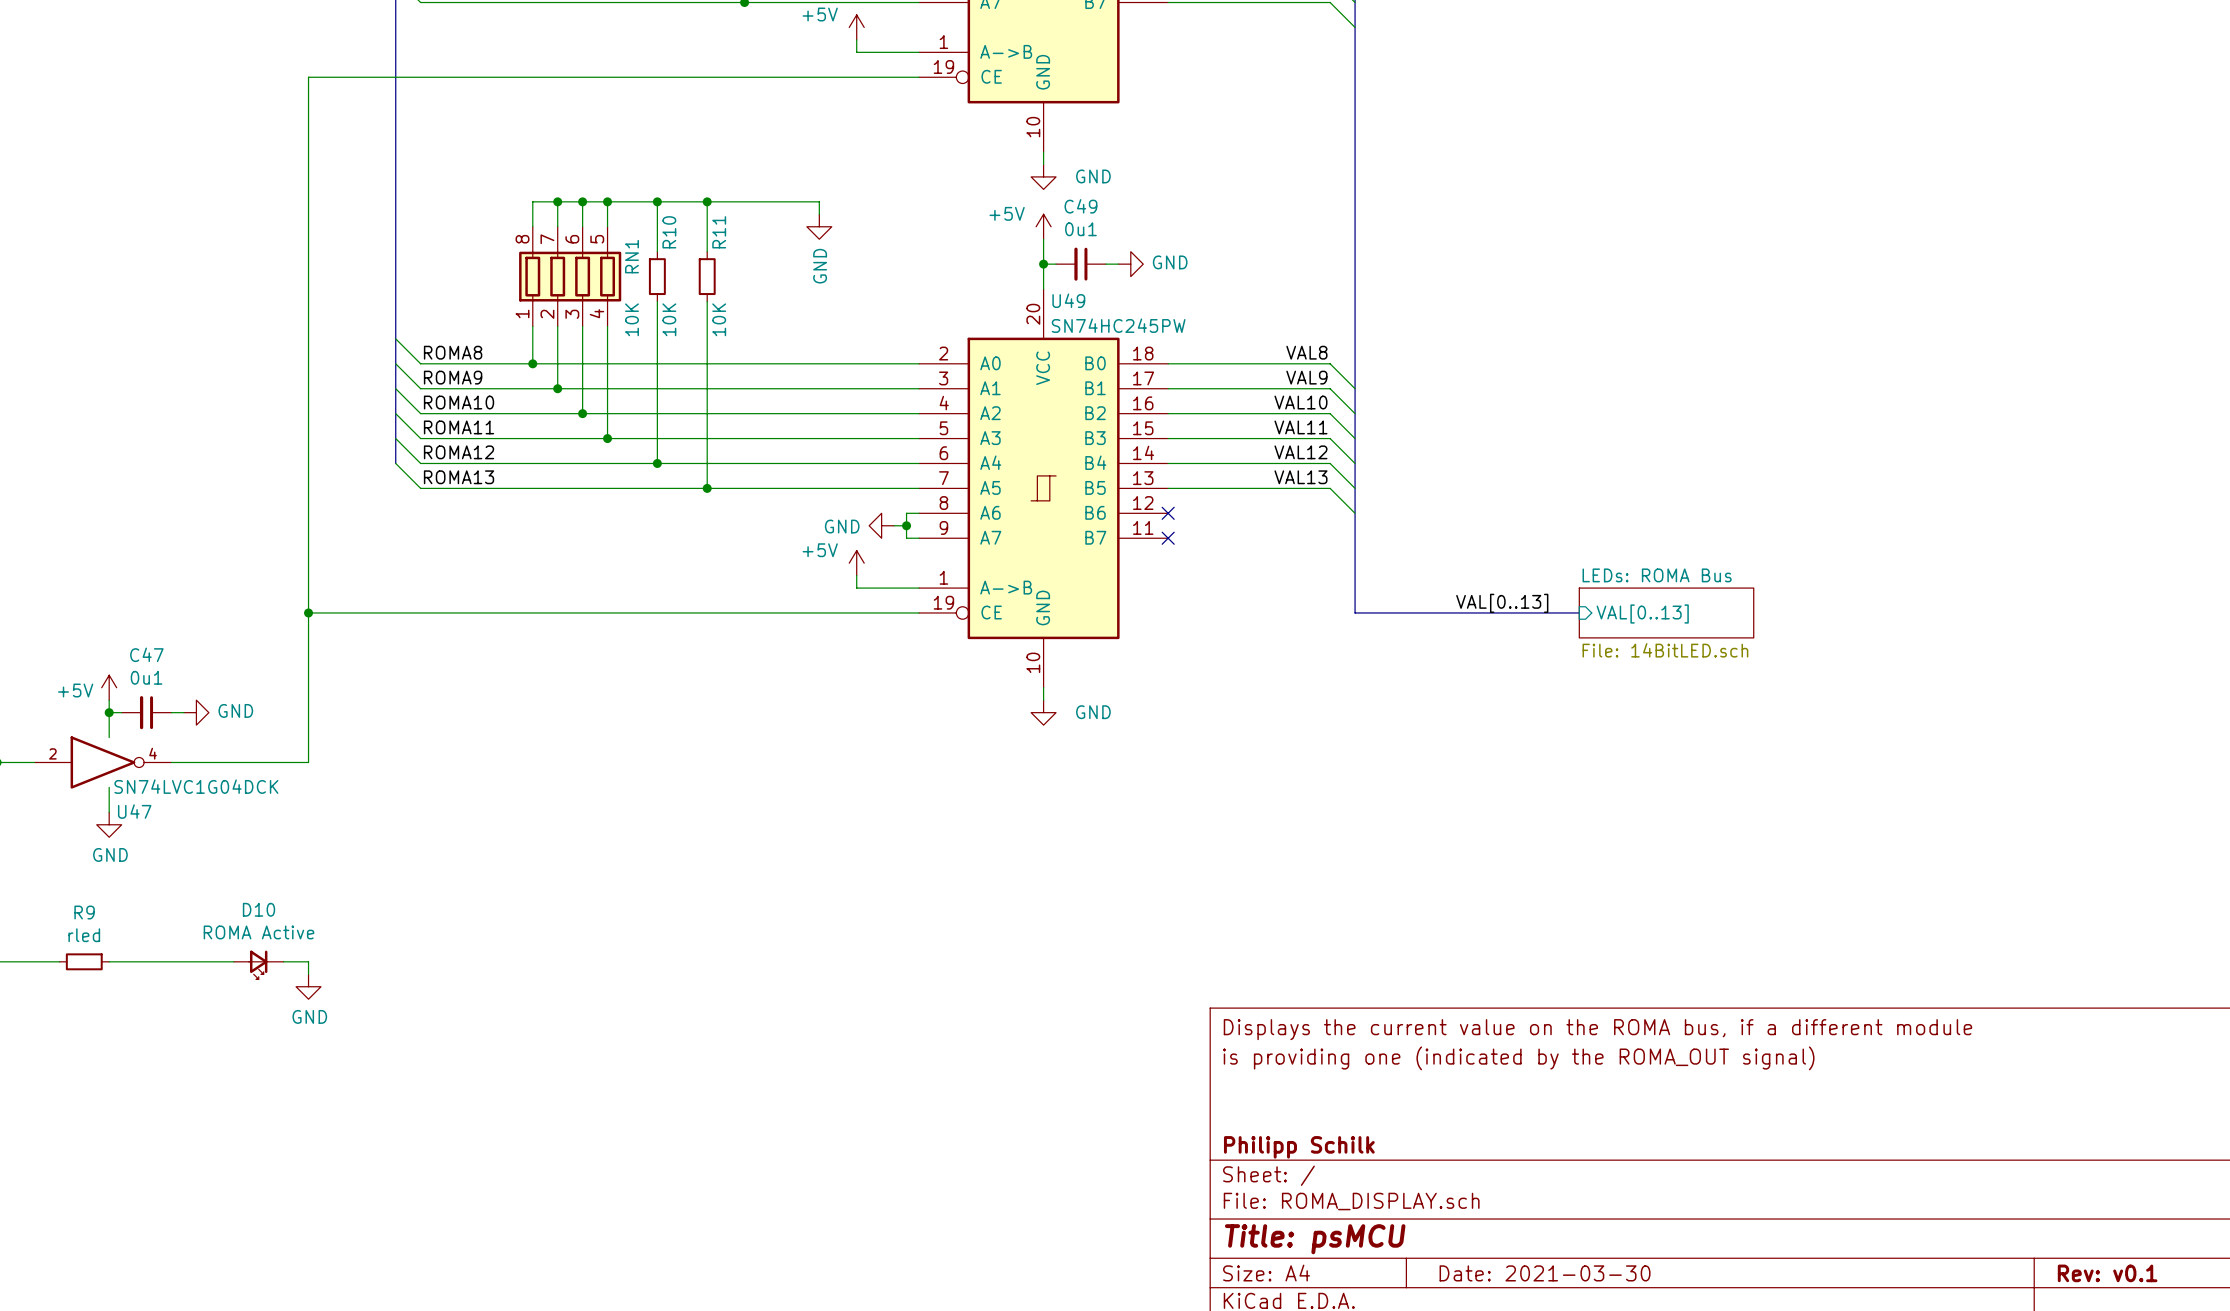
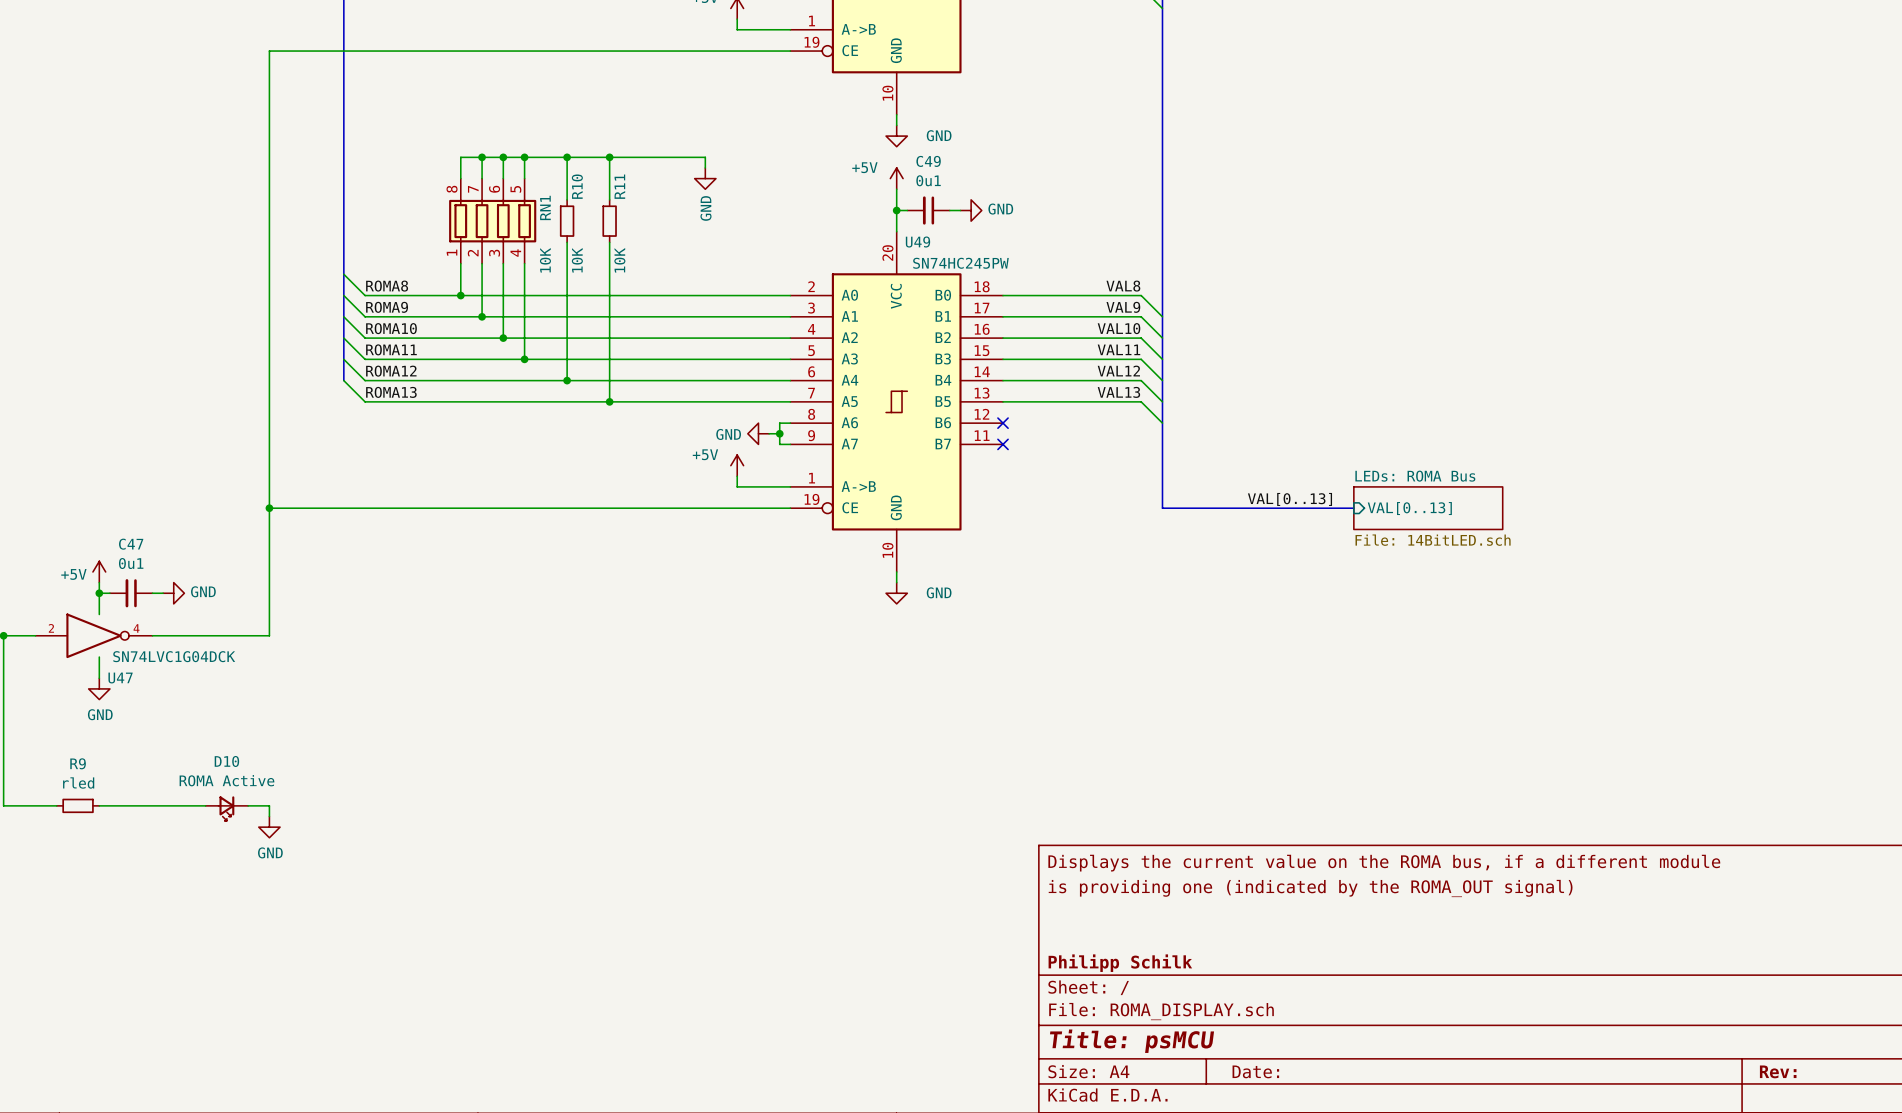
title block: Date: 2021-03-30 (1545, 1273) -> Date: (1255, 1071)
title block: Rev: v0.1 (2107, 1273) -> Rev: (1778, 1071)

